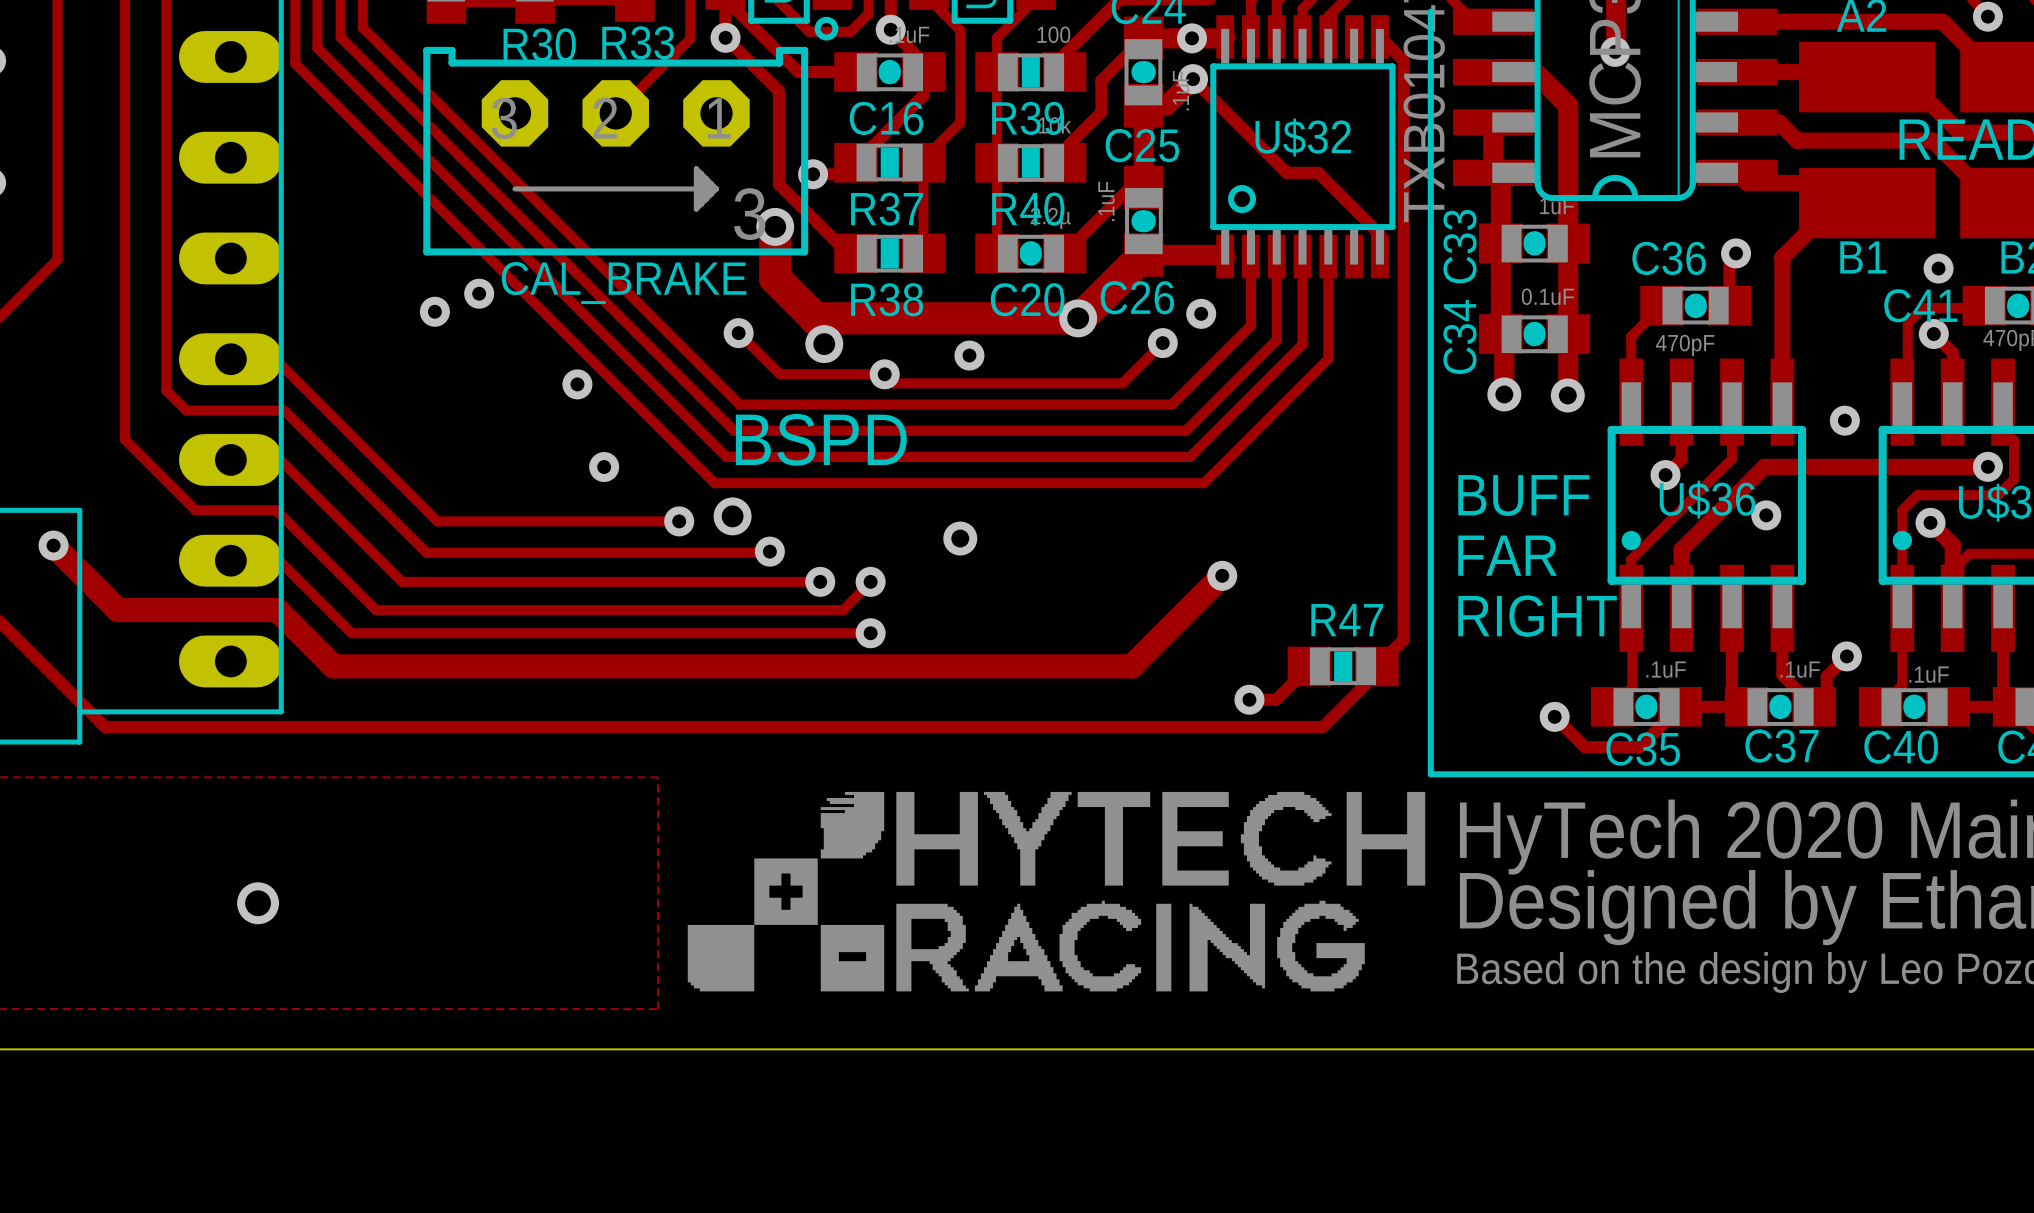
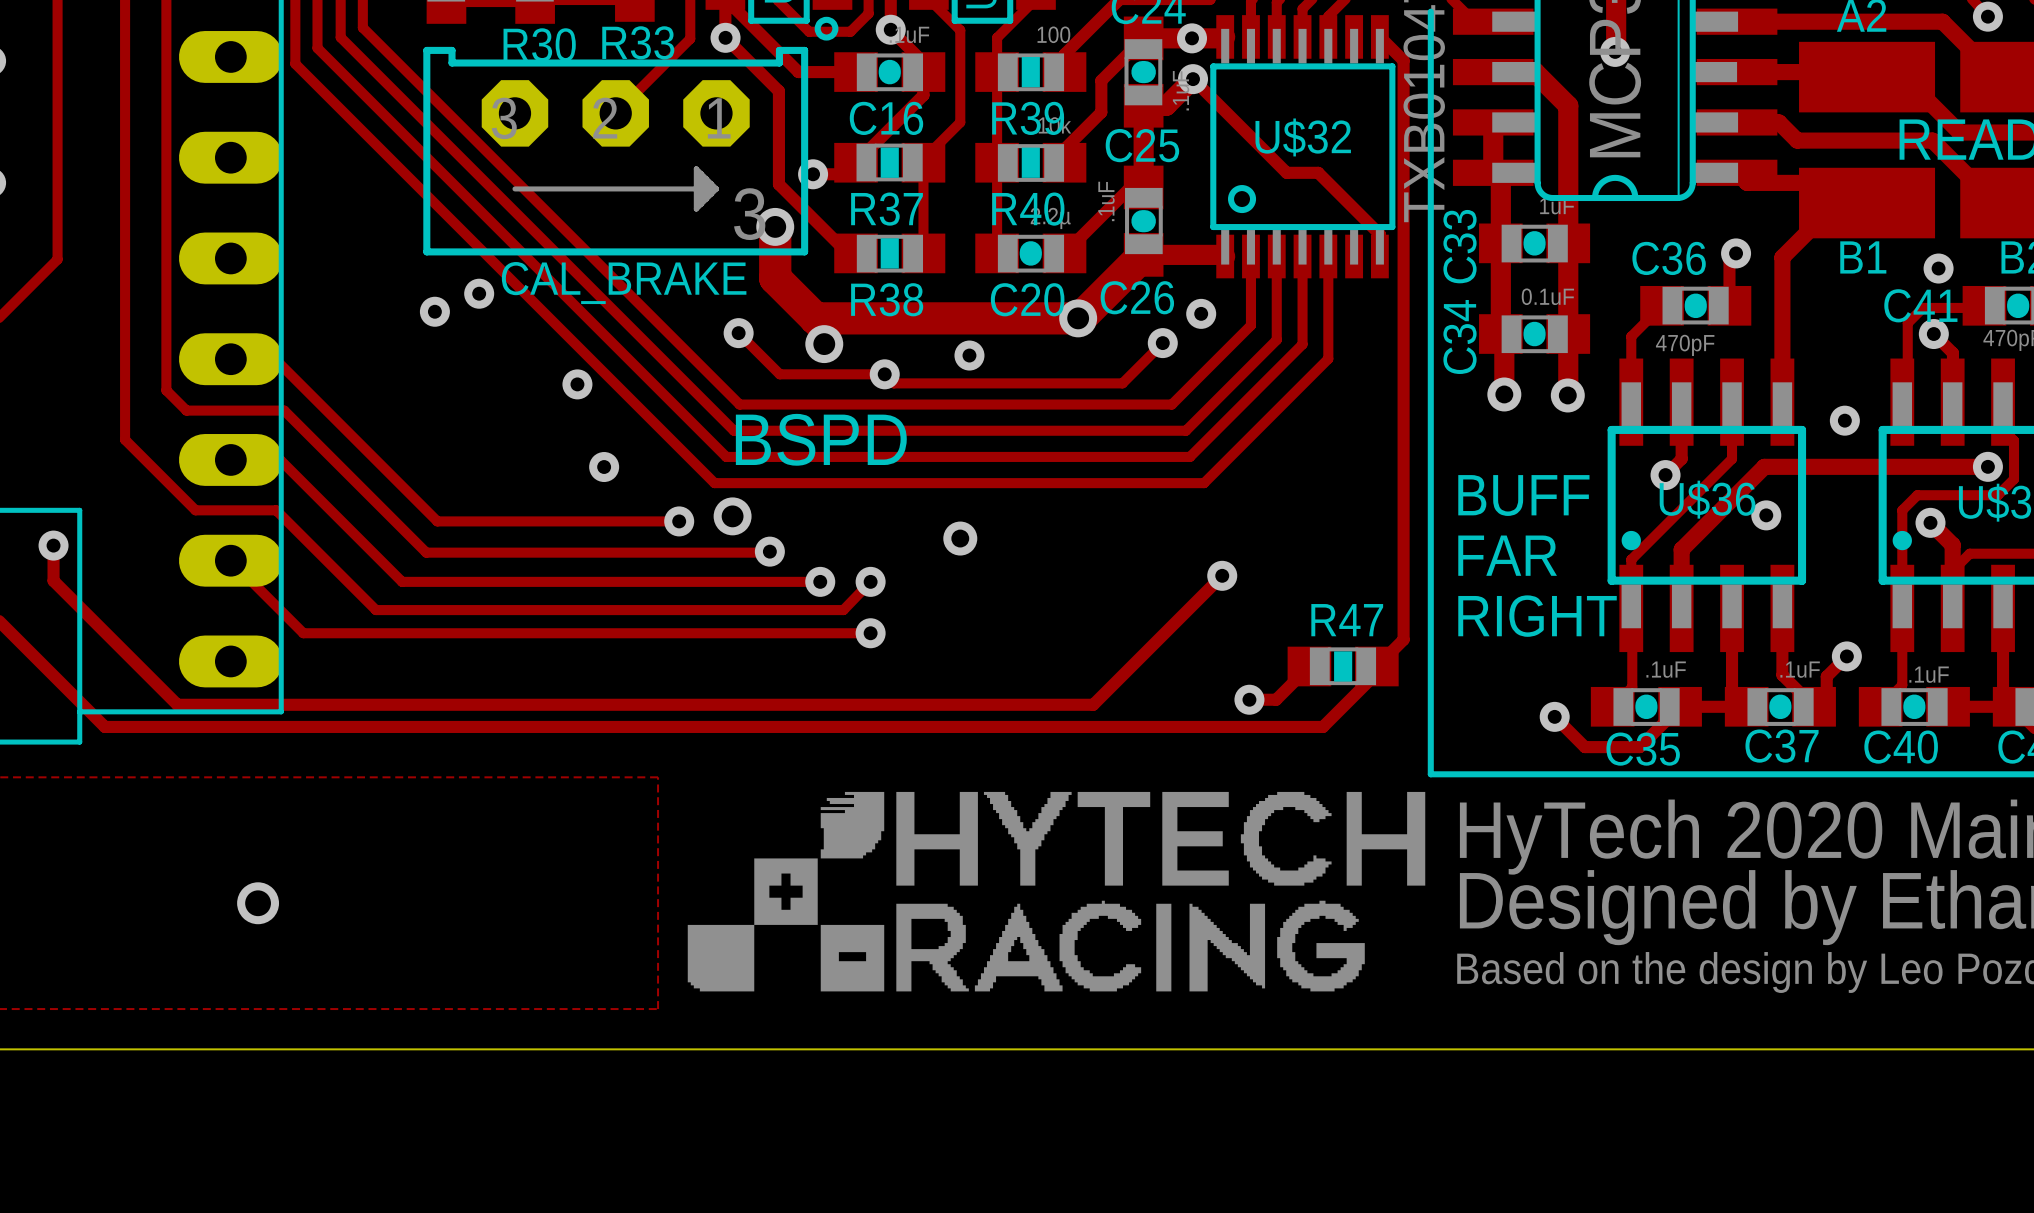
track: (53, 545) (118, 610) (277, 610) (333, 666) (1131, 666) -> (53, 545) (53, 580) (177, 704) (1093, 704) (1131, 666)
track: (230, 560) (279, 560) (351, 633) -> (230, 560) (303, 633) (351, 633)
track width: thick (1222, 575) (1131, 666) -> thin (1222, 575) (1131, 666)

